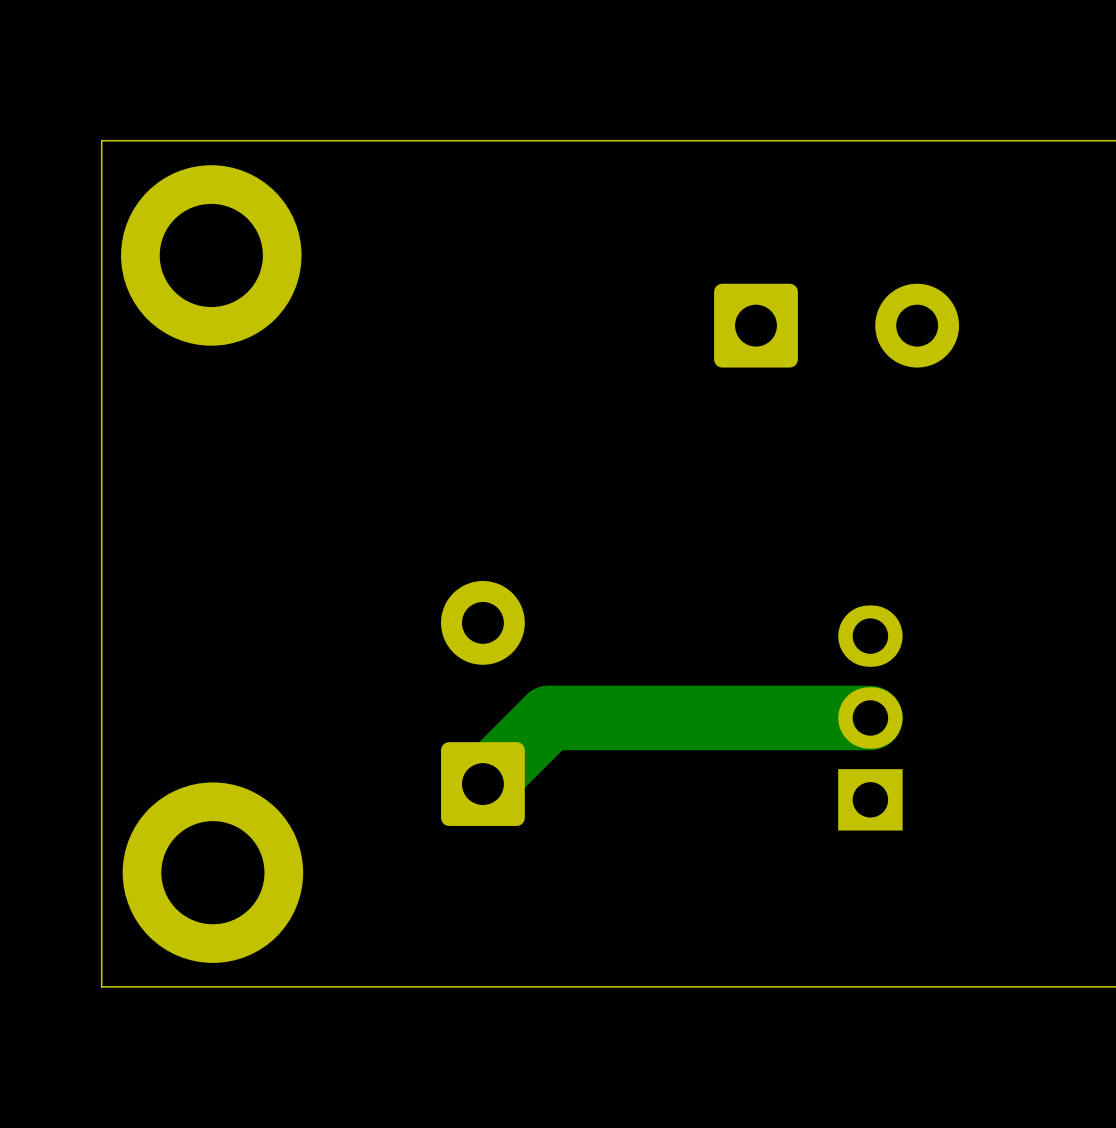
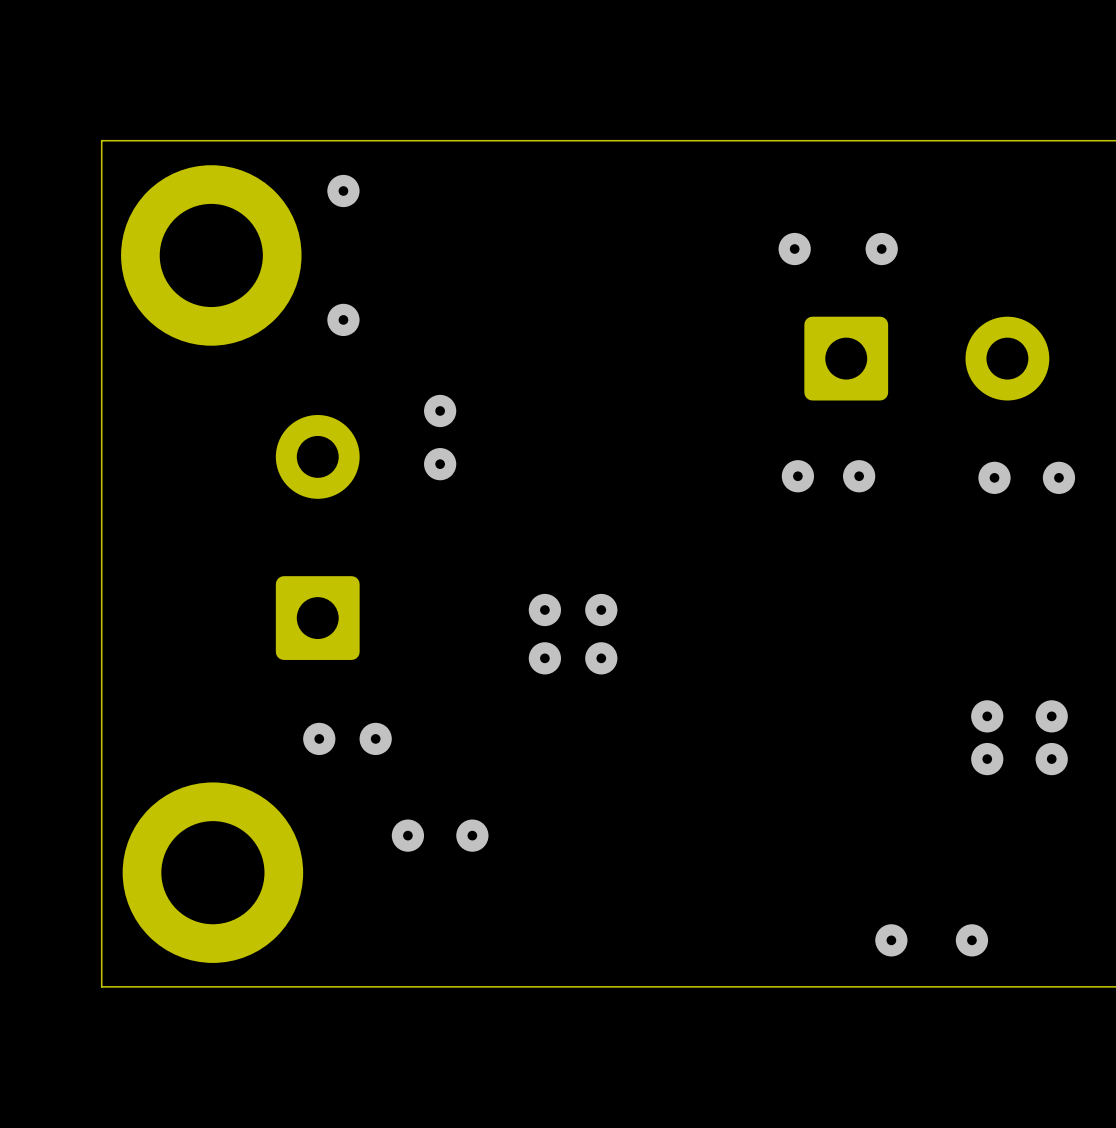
via: none -> (343, 191)
via: none -> (794, 249)
via: none -> (881, 249)
via: none -> (343, 319)
part position: (836, 325) -> (926, 358)
via: none -> (440, 410)
via: none -> (440, 464)
via: none -> (797, 476)
via: none -> (859, 476)
via: none -> (994, 477)
via: none -> (1058, 477)
via: none -> (544, 610)
via: none -> (601, 610)
via: none -> (544, 658)
via: none -> (601, 658)
part position: (482, 703) -> (317, 537)
via: none -> (987, 716)
via: none -> (1051, 716)
track: (870, 717) (548, 717) (482, 784) (482, 787) -> none
part: (870, 717) -> none
via: none -> (319, 738)
via: none -> (375, 738)
via: none -> (987, 759)
via: none -> (1051, 759)
via: none -> (407, 835)
via: none -> (472, 835)
via: none -> (891, 940)
via: none -> (971, 940)

